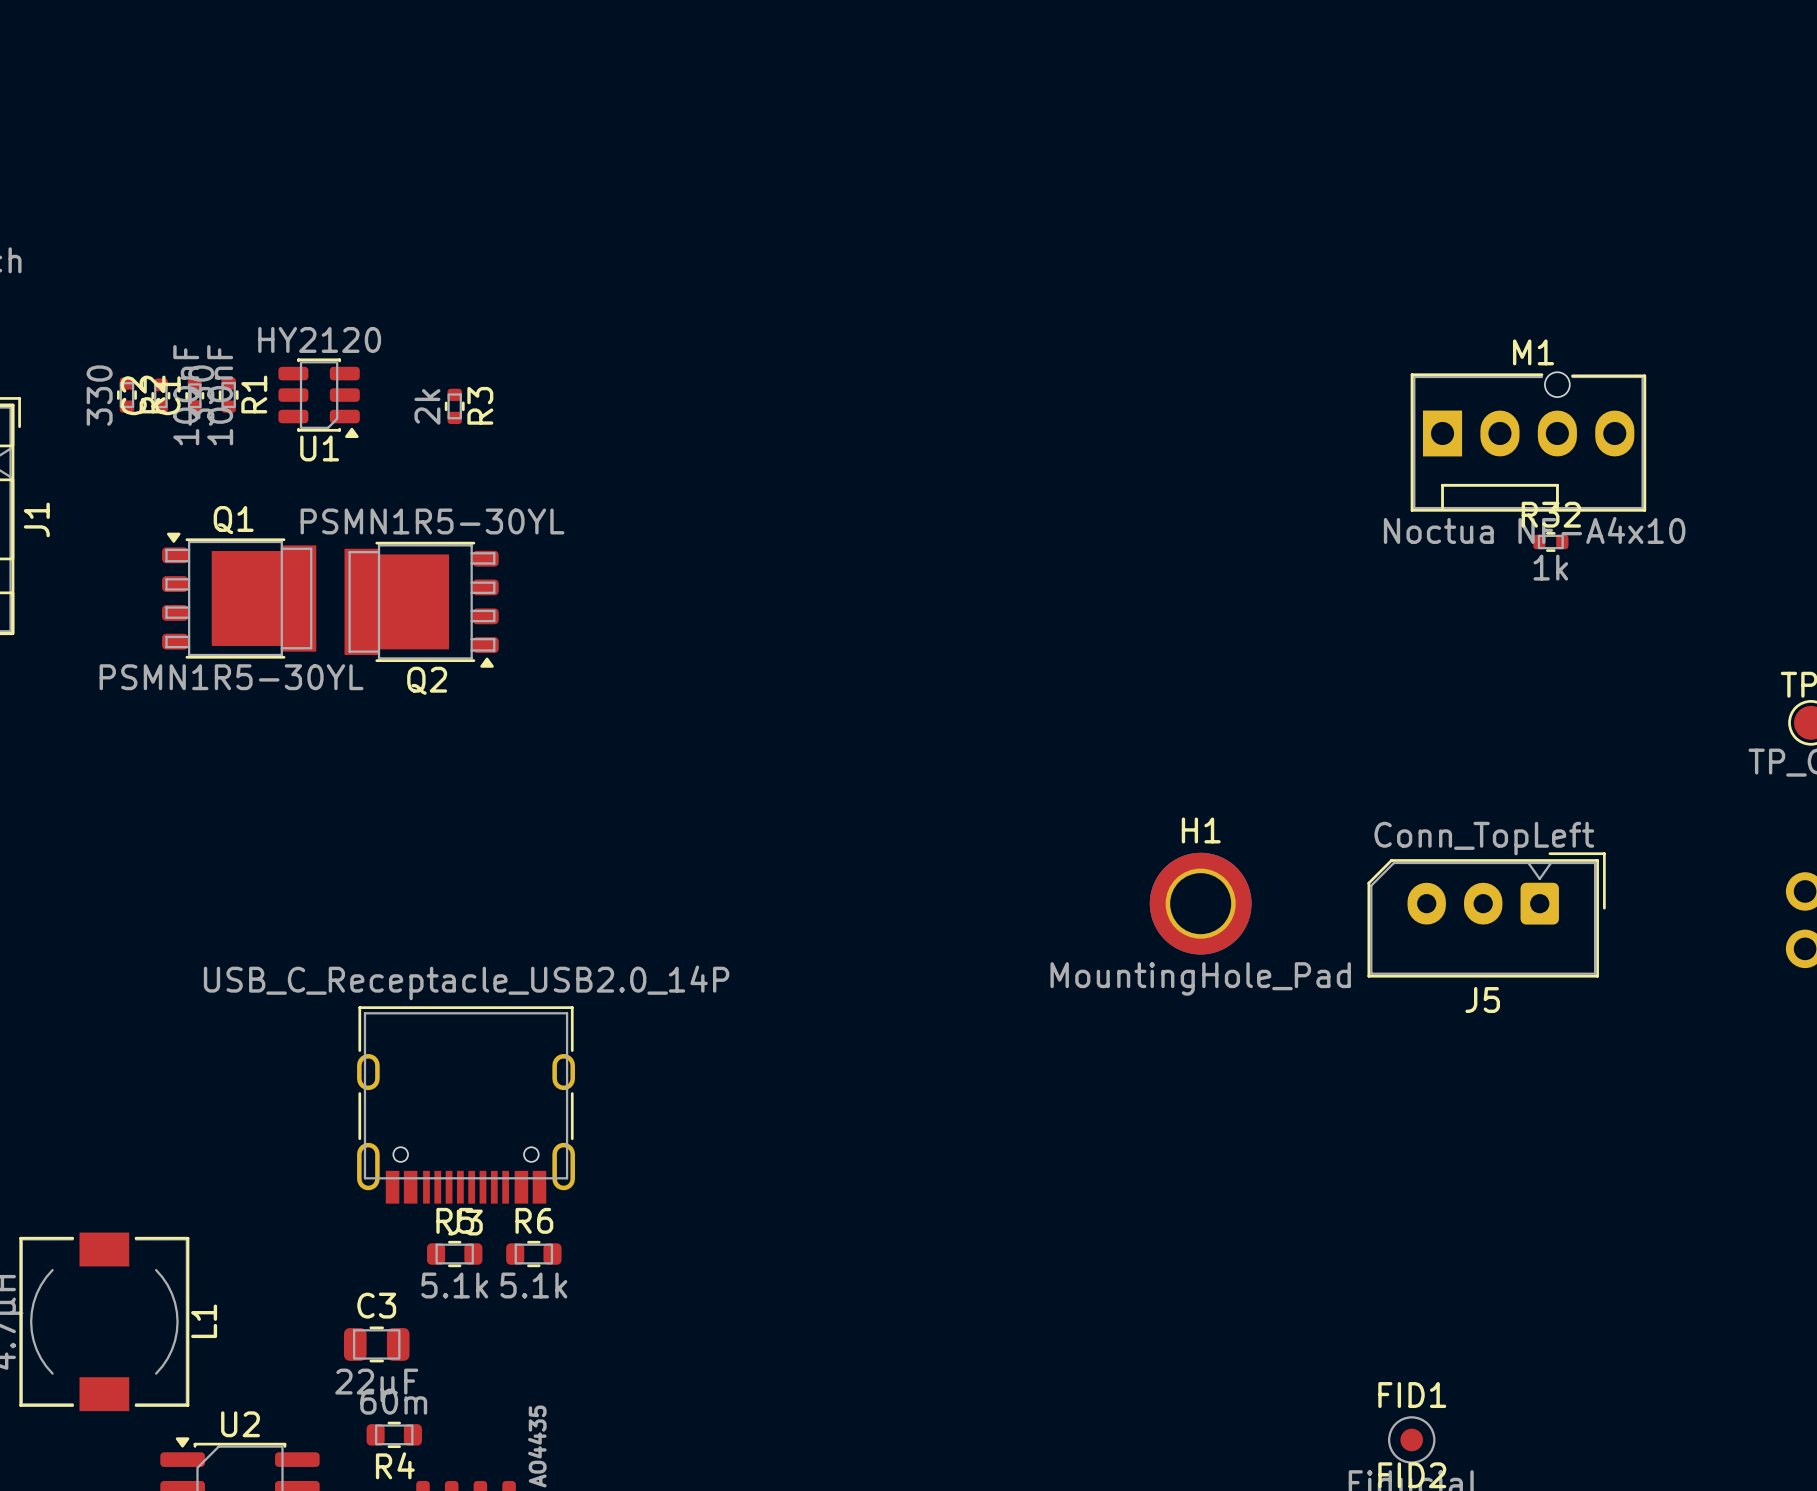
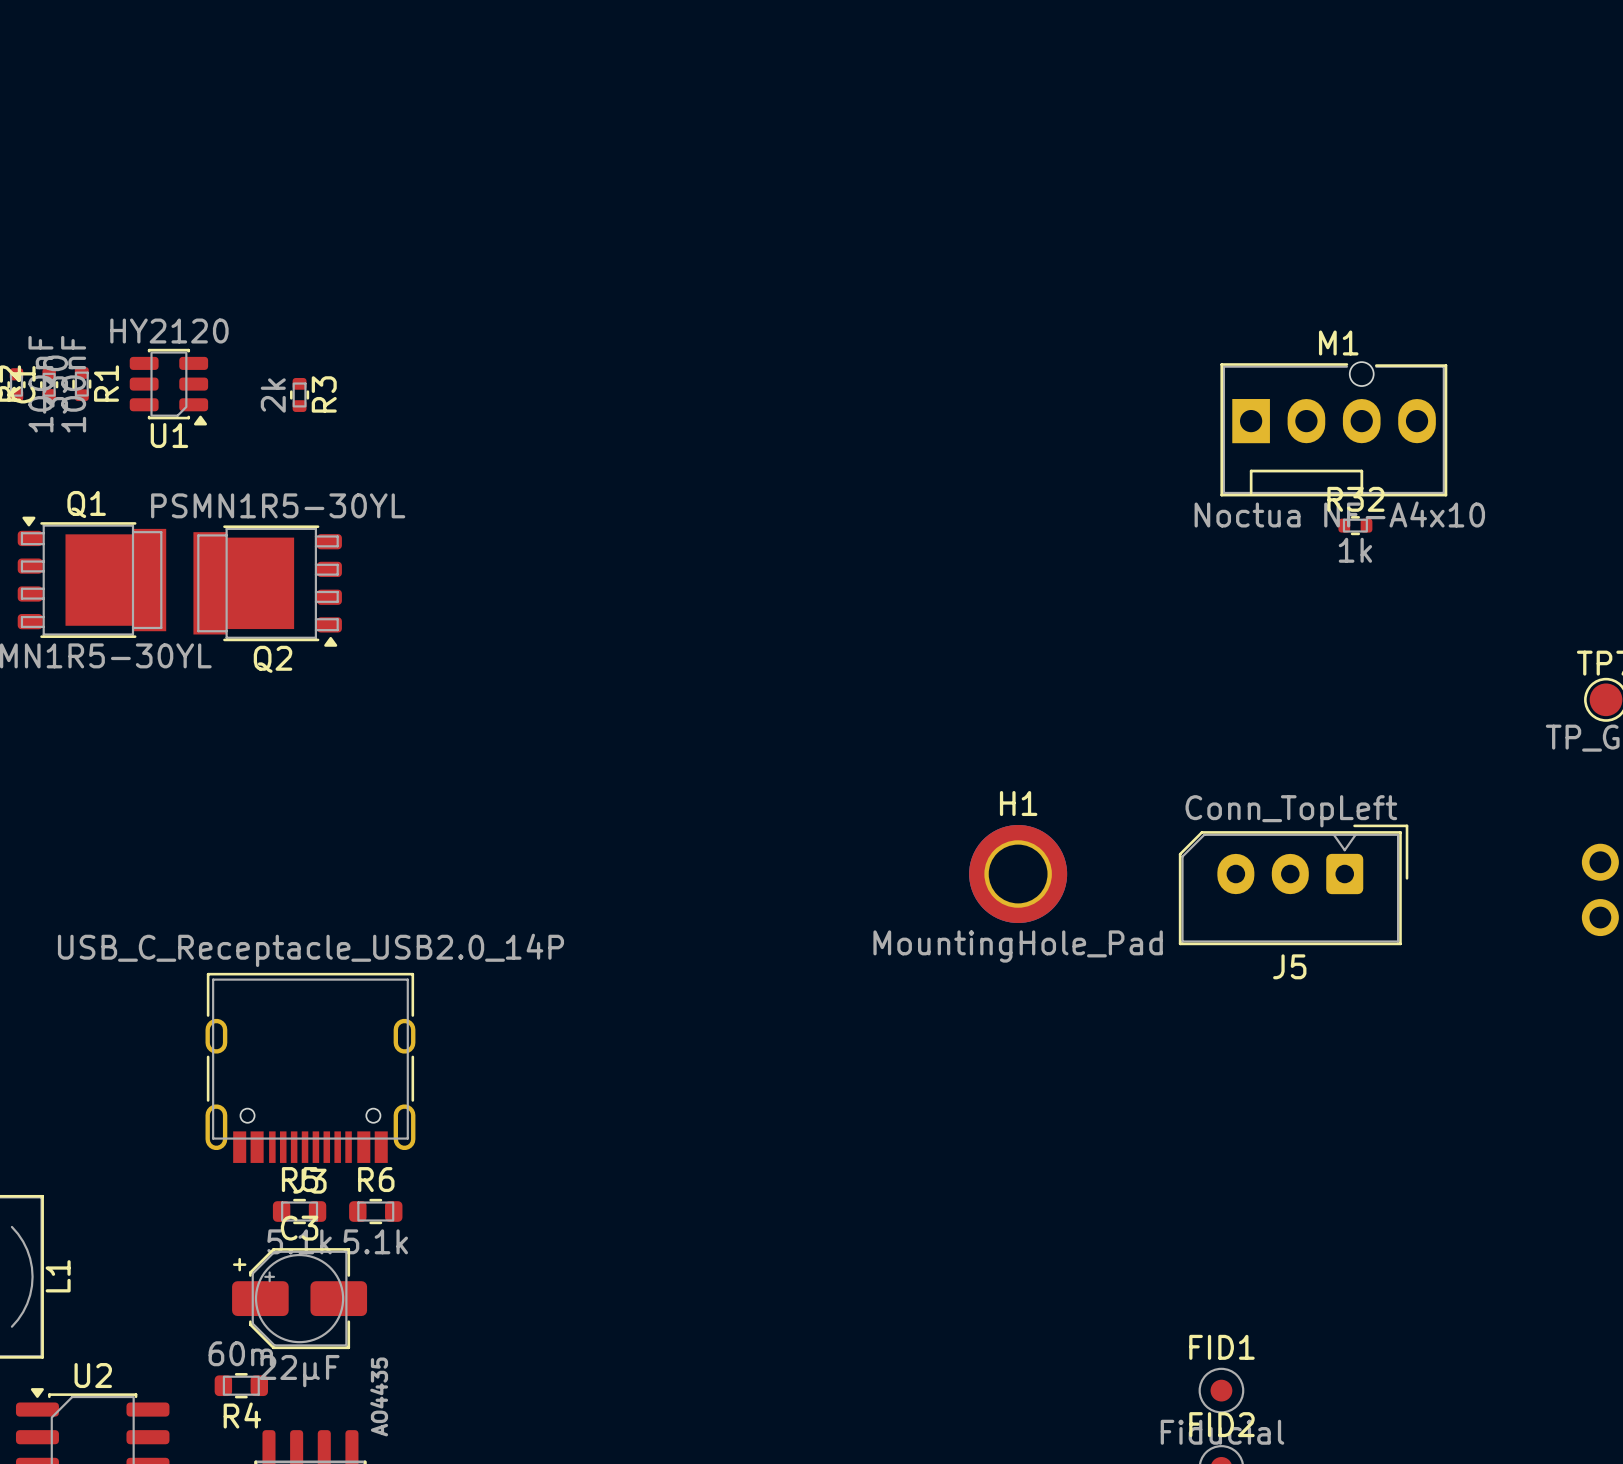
C3 footprint: [343, 1326, 410, 1363] -> [232, 1248, 368, 1350]

